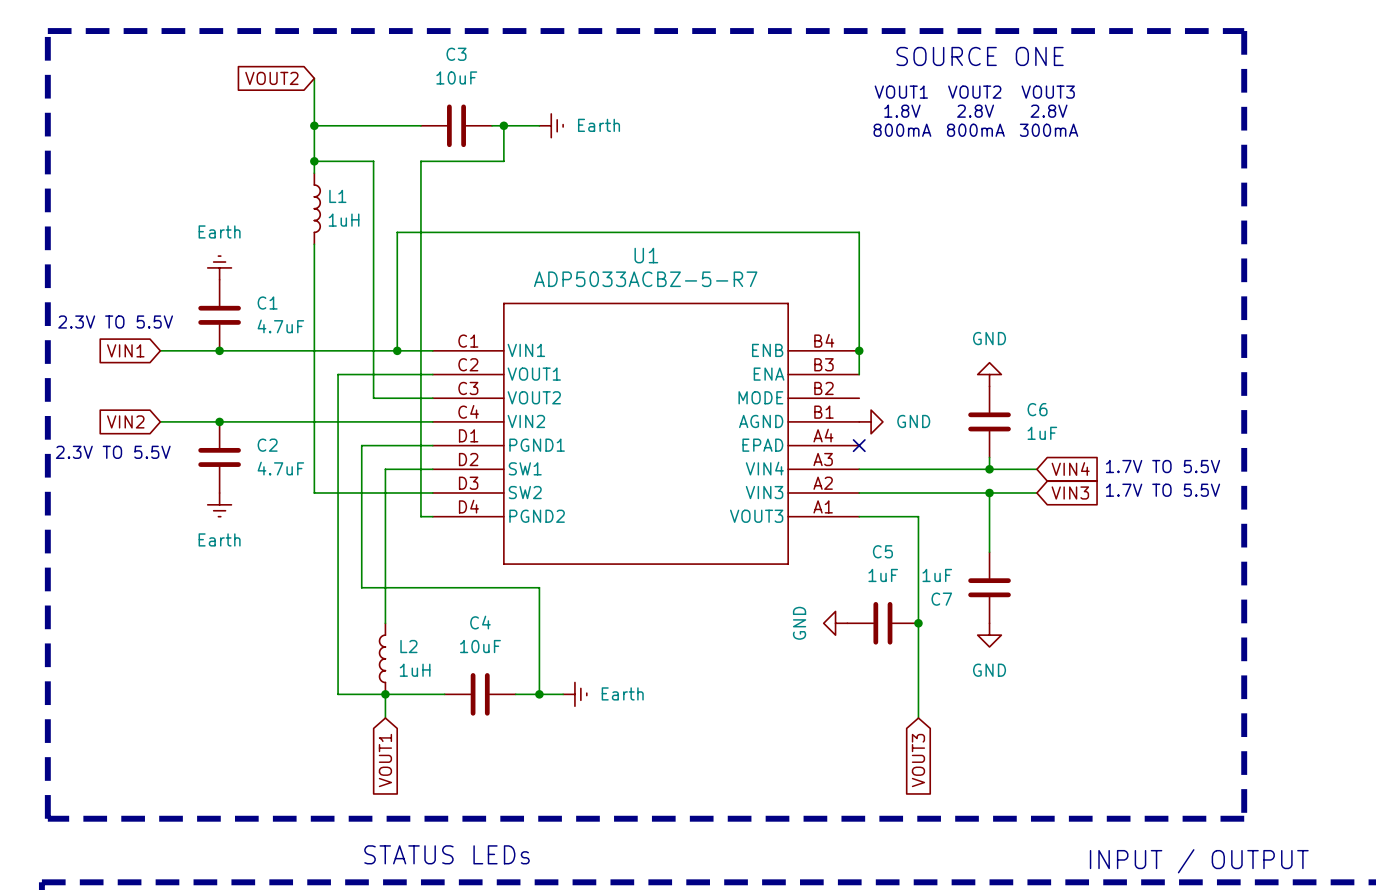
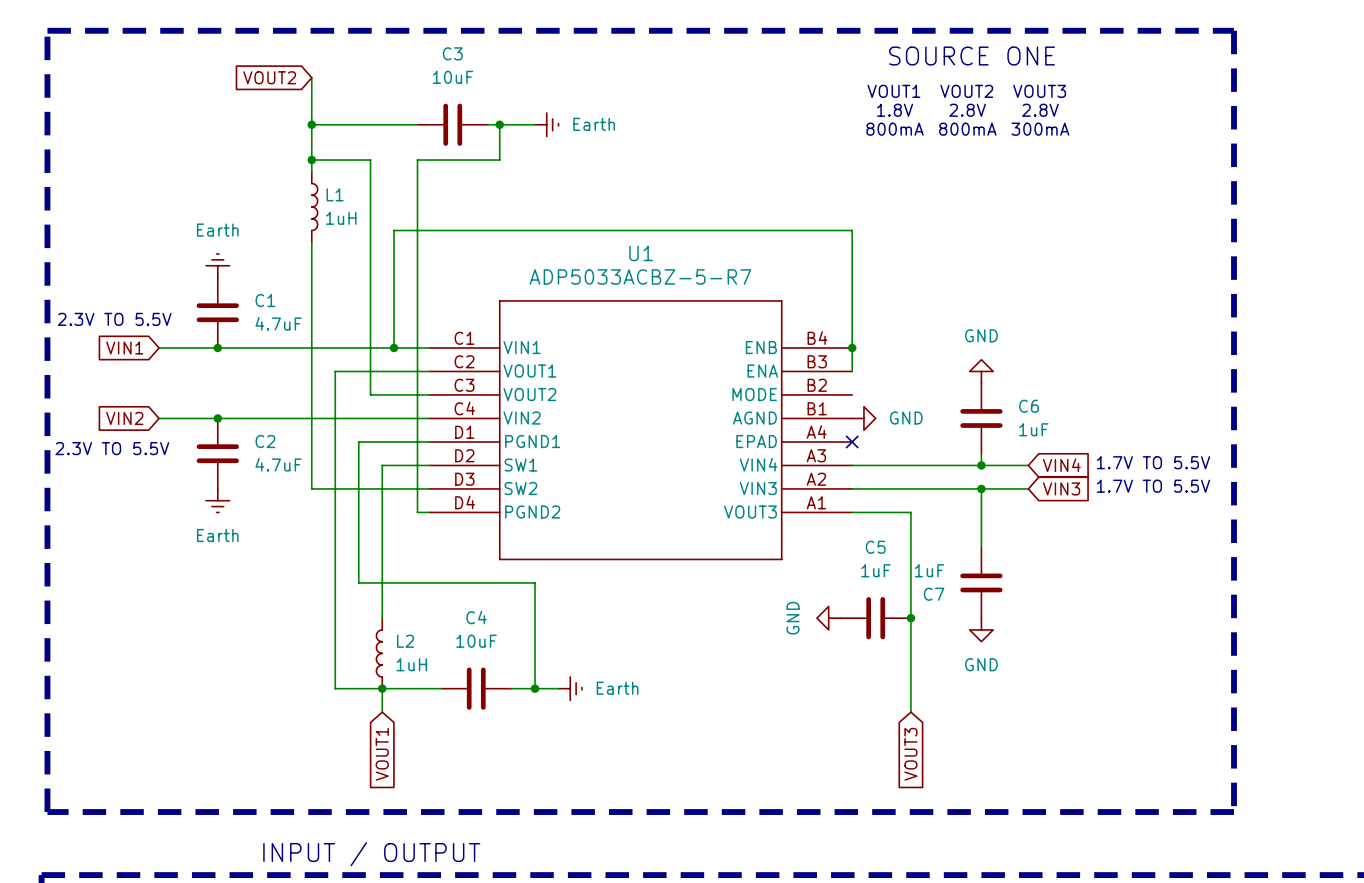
text: STATUS LEDs (447, 854) -> none
text: none -> INPUT / OUTPUT (371, 854)
text: INPUT / OUTPUT (1199, 861) -> none

